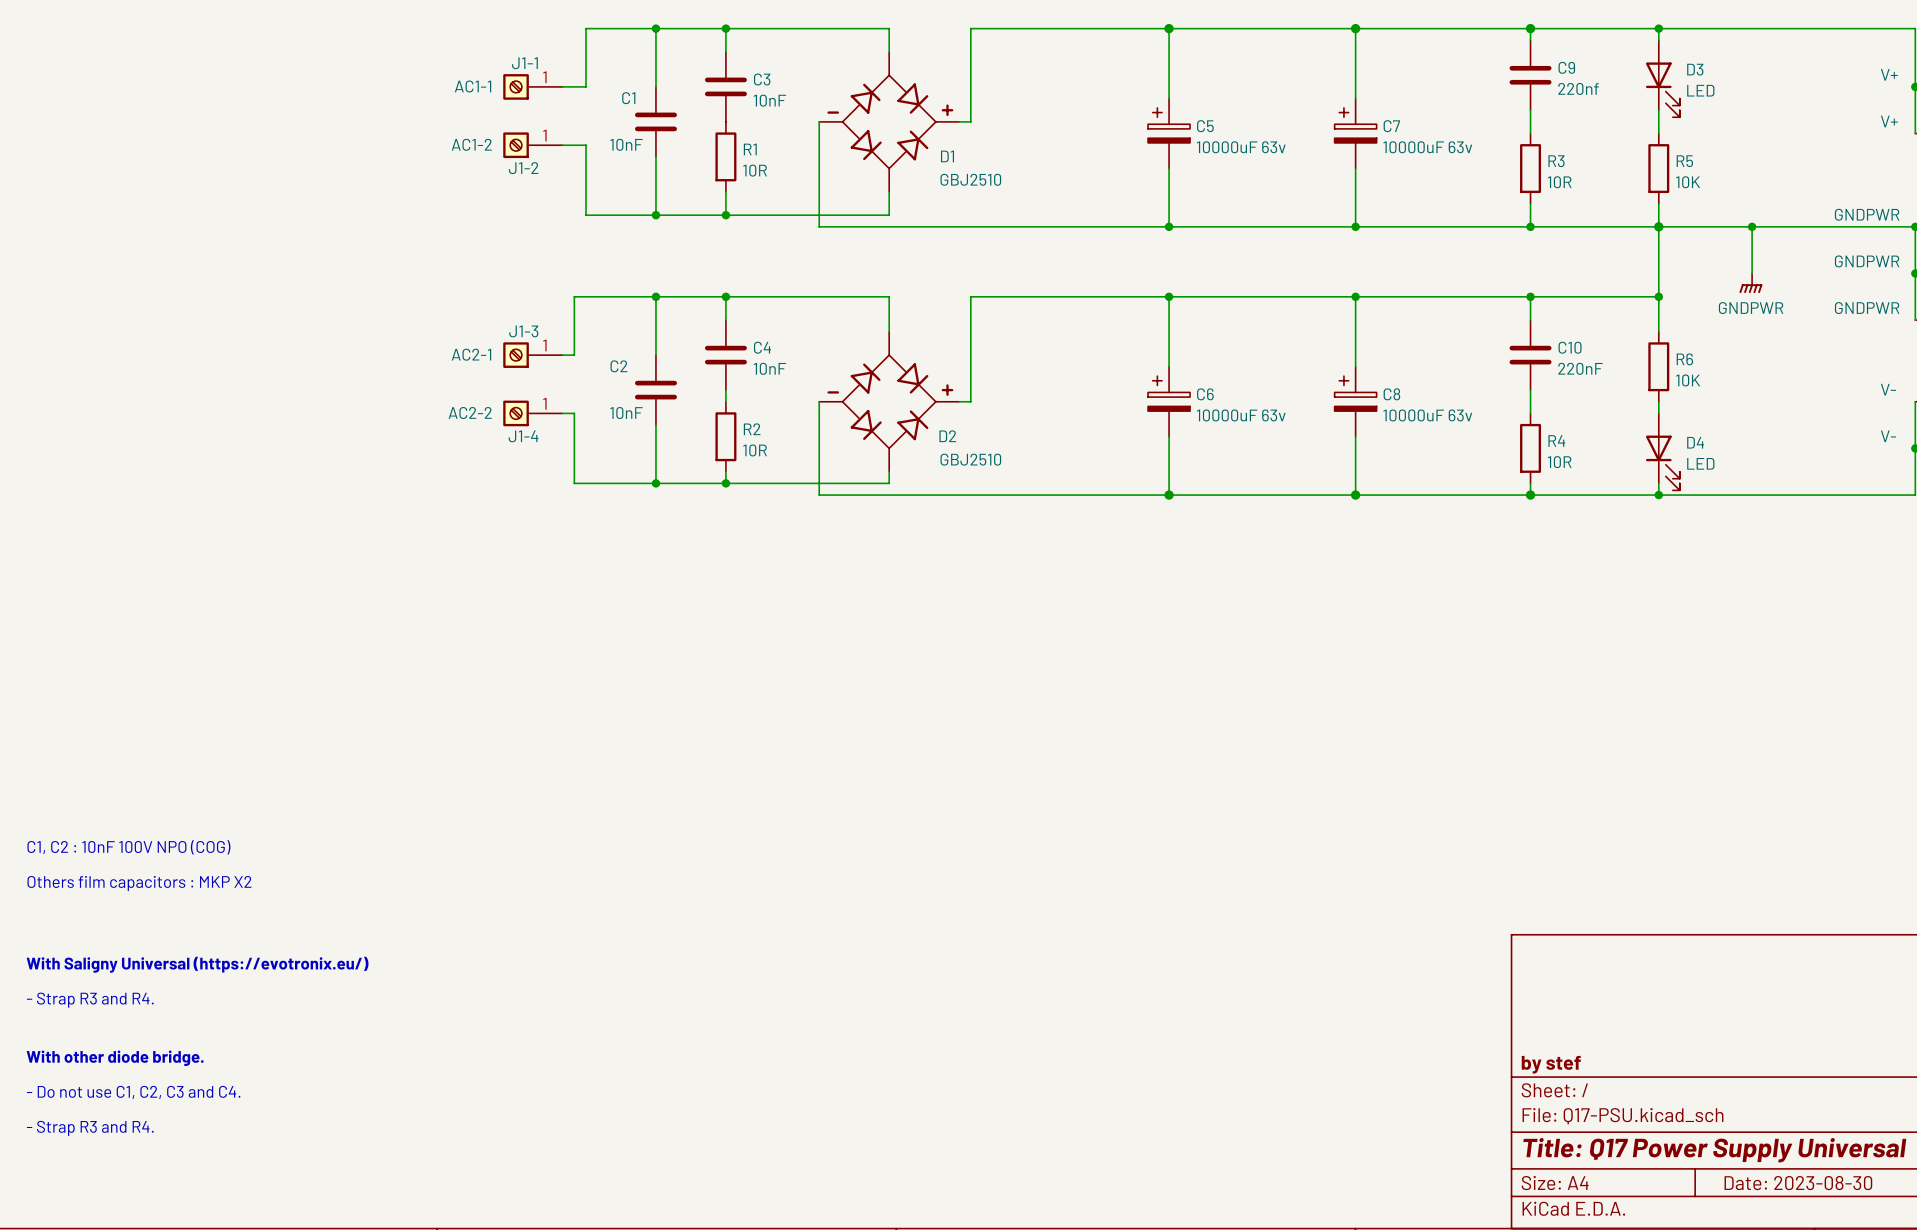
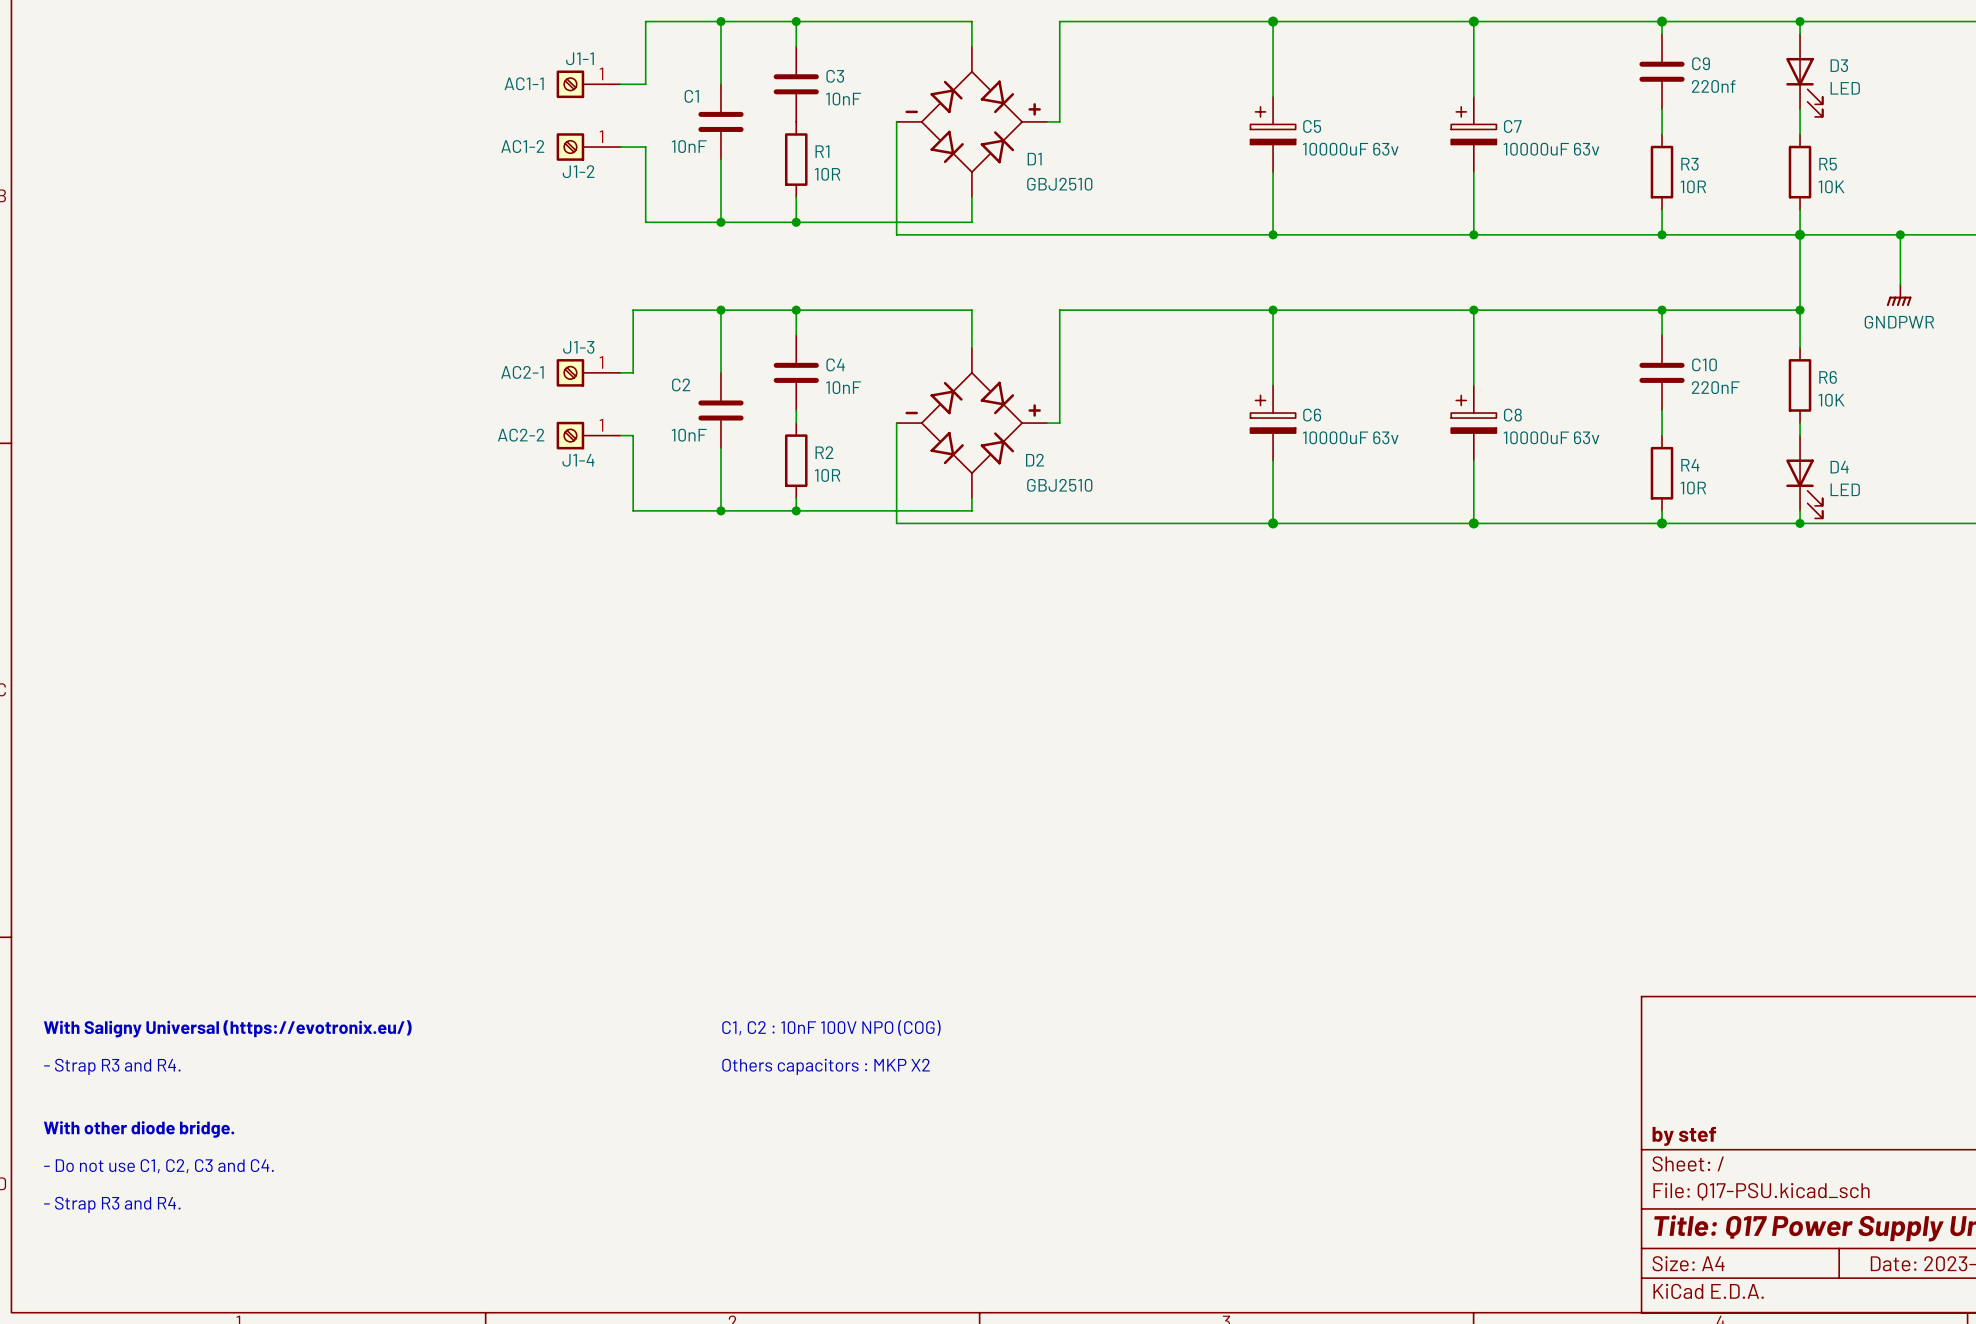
text: C1, C2 : 10nF 100V NPO (COG) (128, 847) -> none
text: Others film capacitors : MKP X2 (139, 883) -> none
text: none -> C1, C2 : 10nF 100V NPO (COG) (831, 1027)
text: none -> Others capacitors : MKP X2 (826, 1066)

